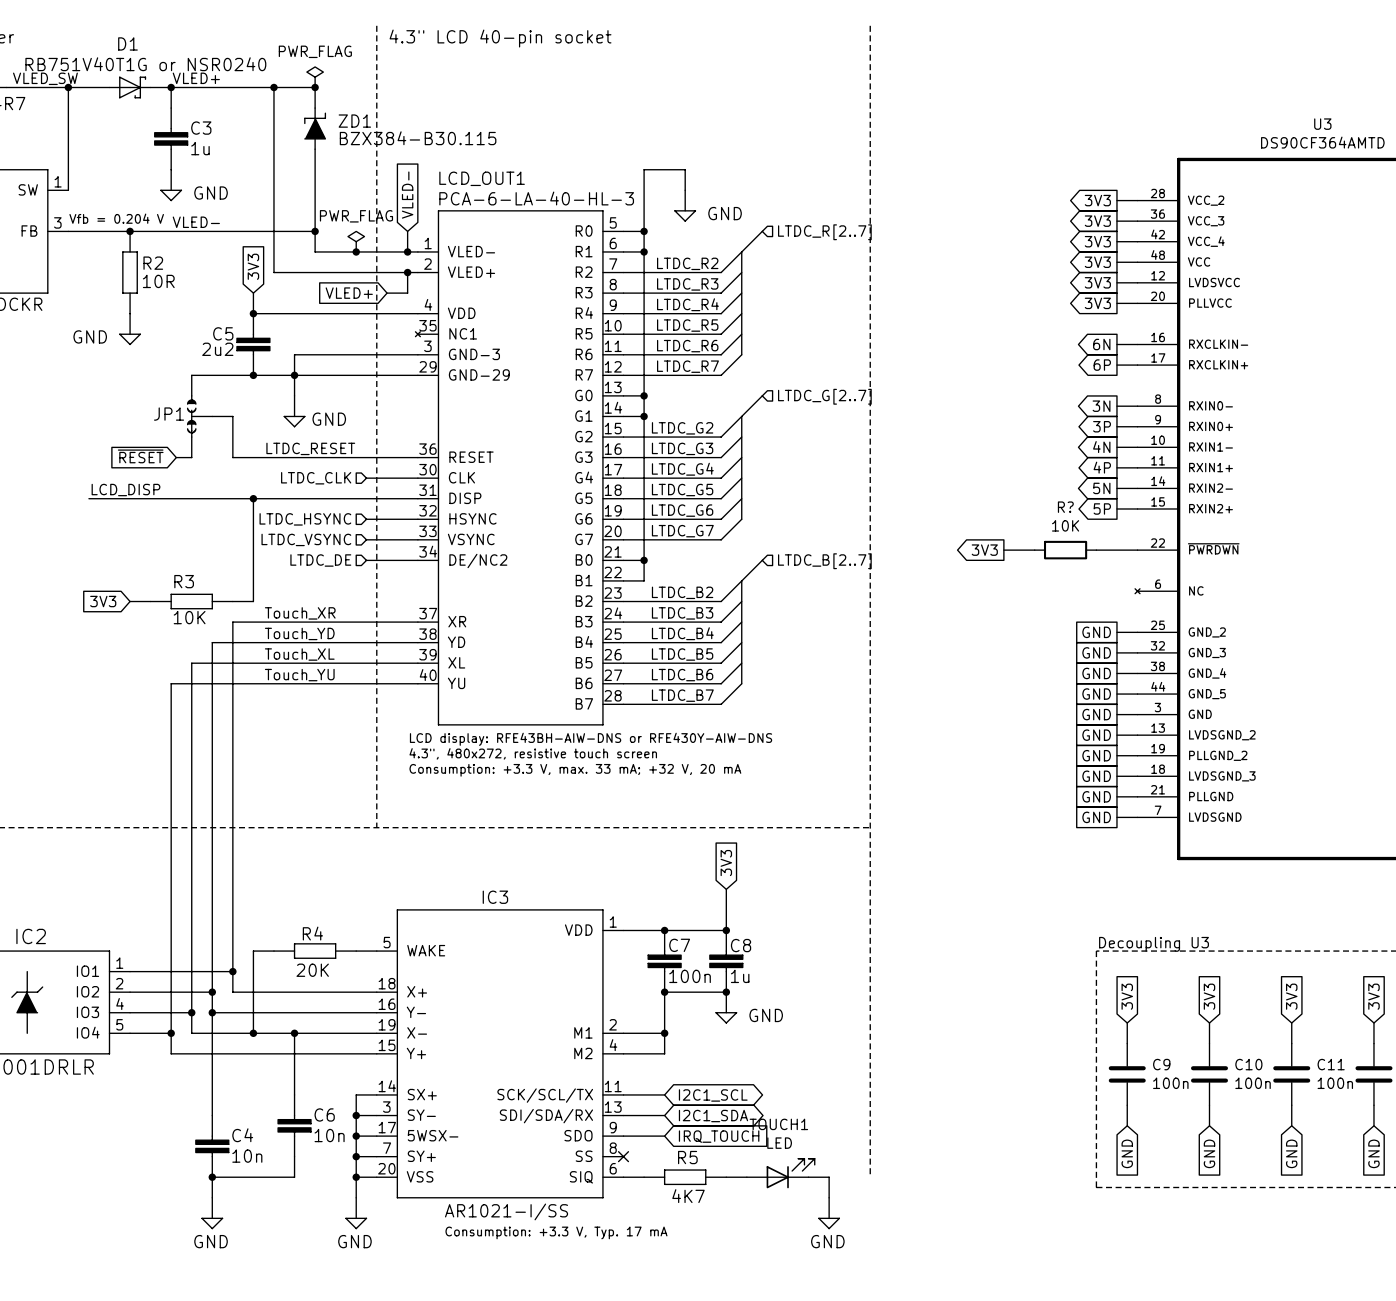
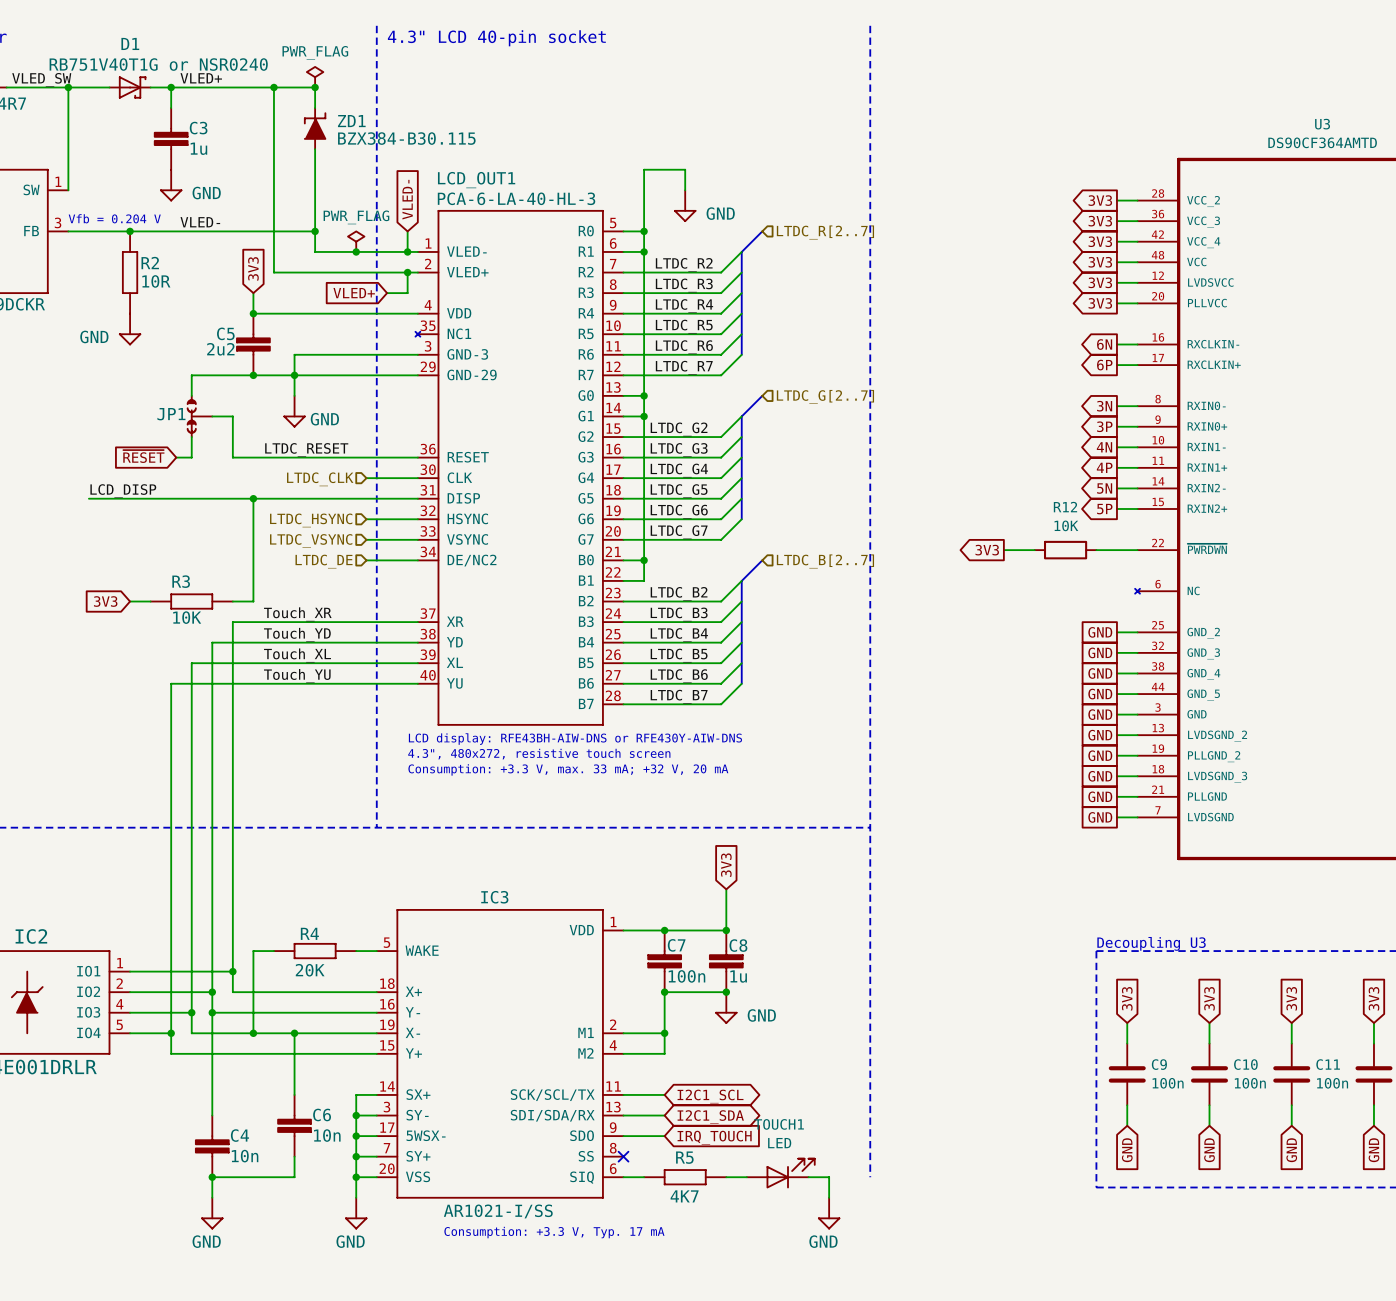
R? name: R? (1065, 507) -> R12 (1065, 507)

